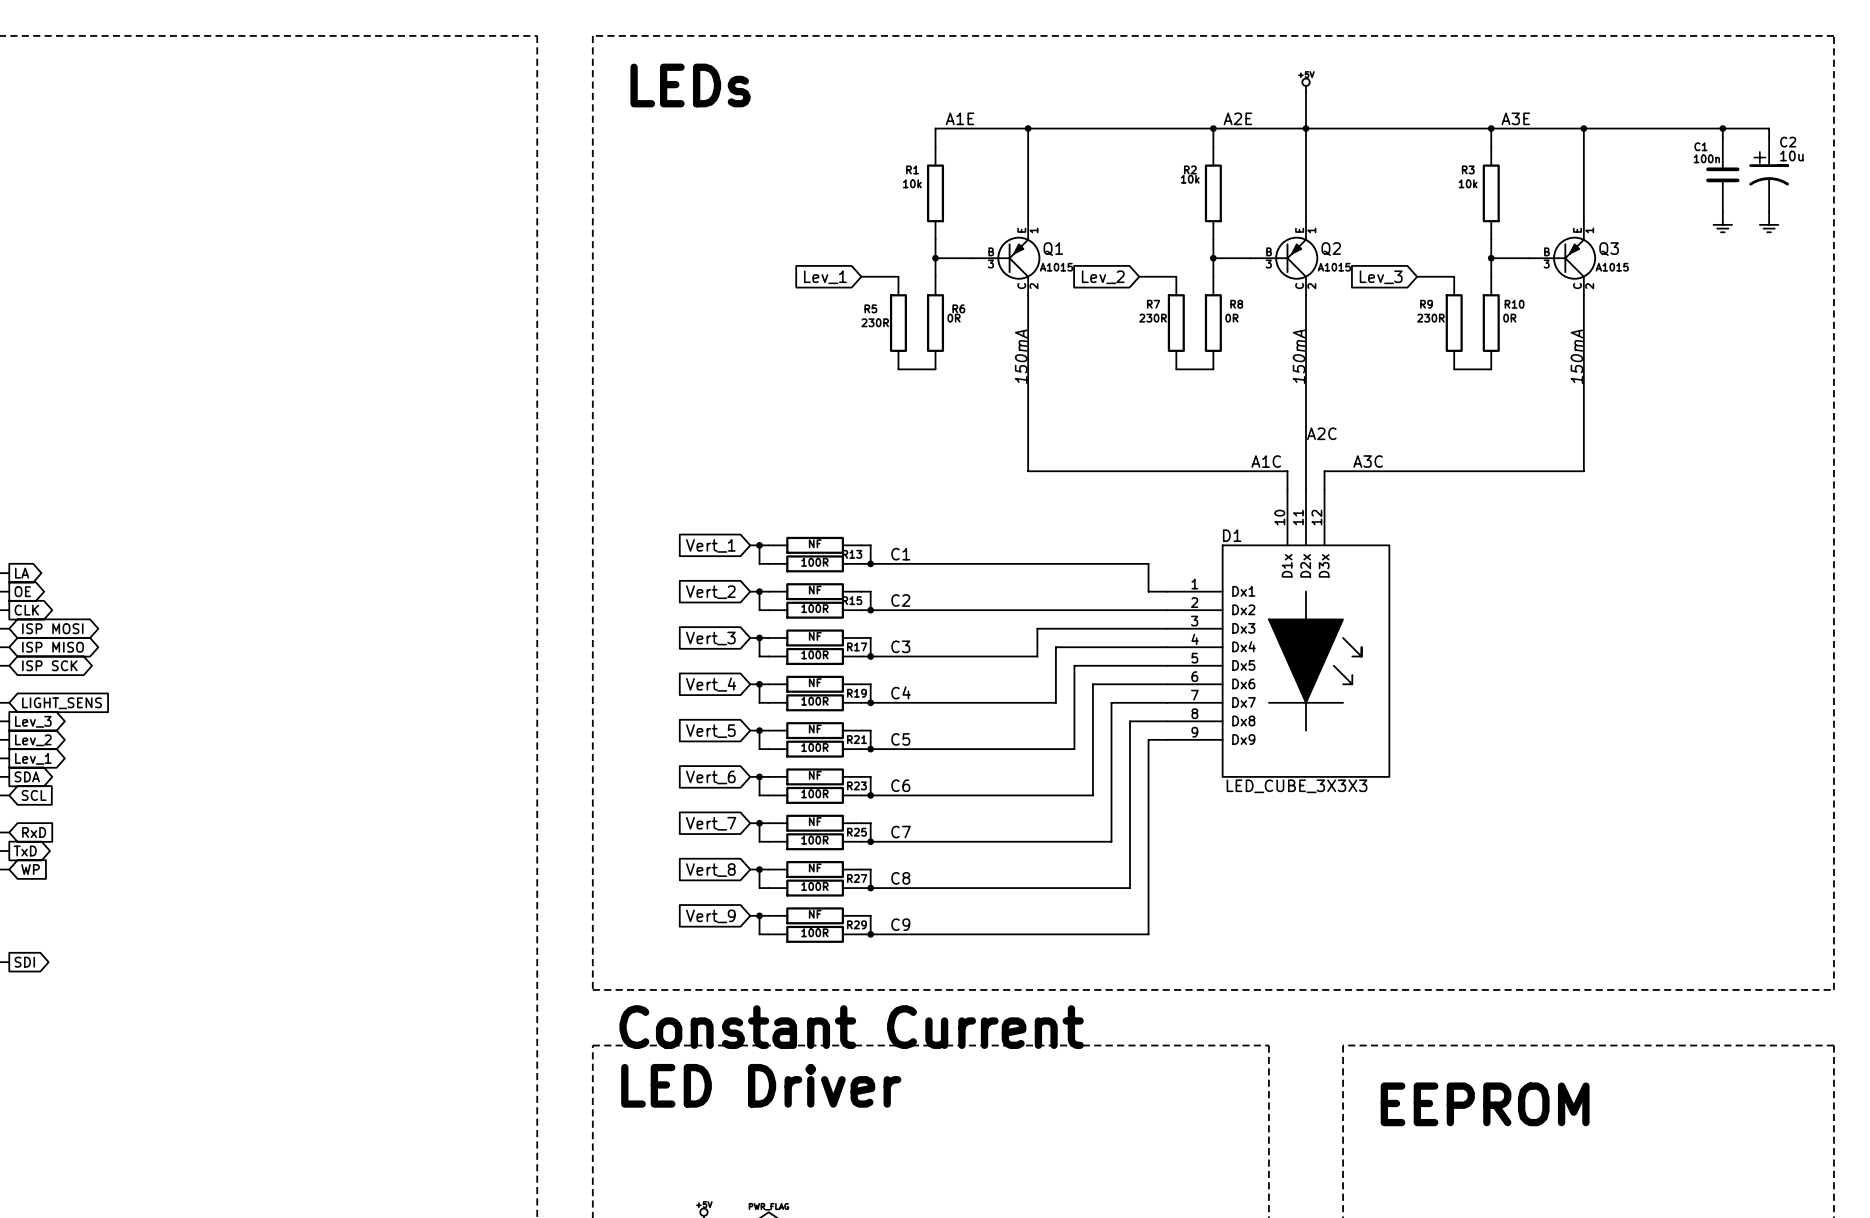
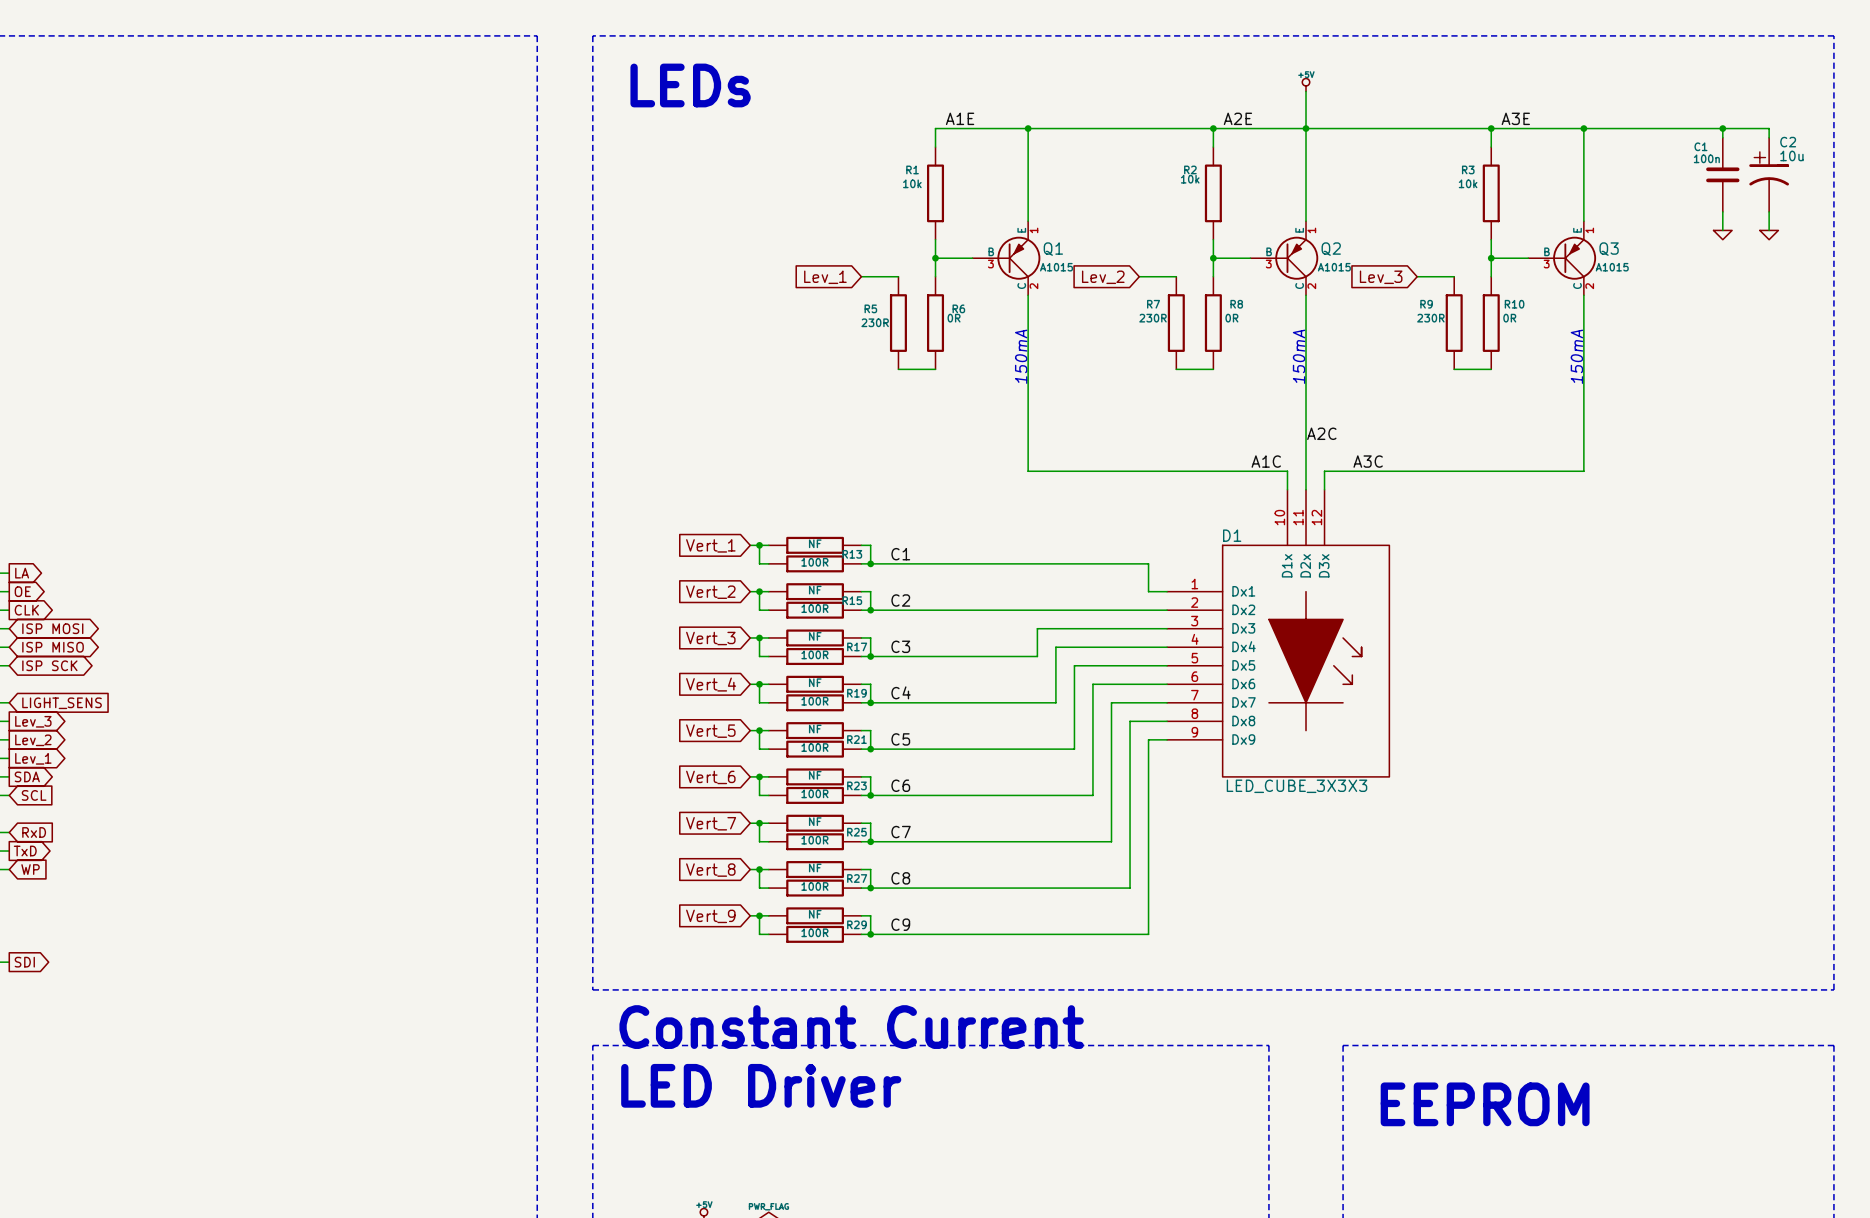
power symbol: (1722, 226) -> none
power symbol: (1769, 226) -> none
power symbol: none -> (1722, 235)
power symbol: none -> (1769, 235)

